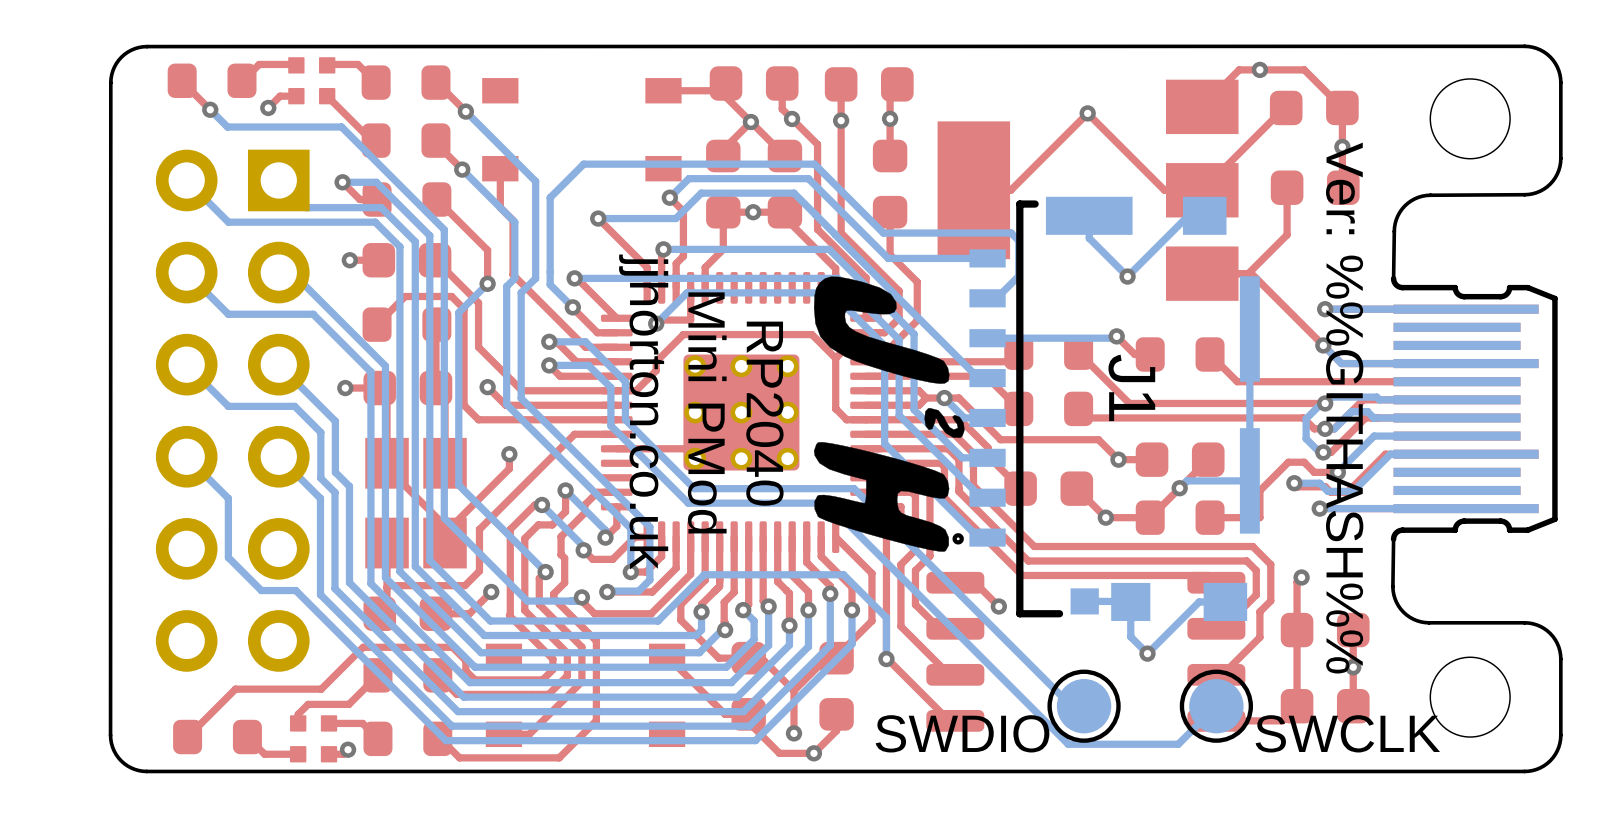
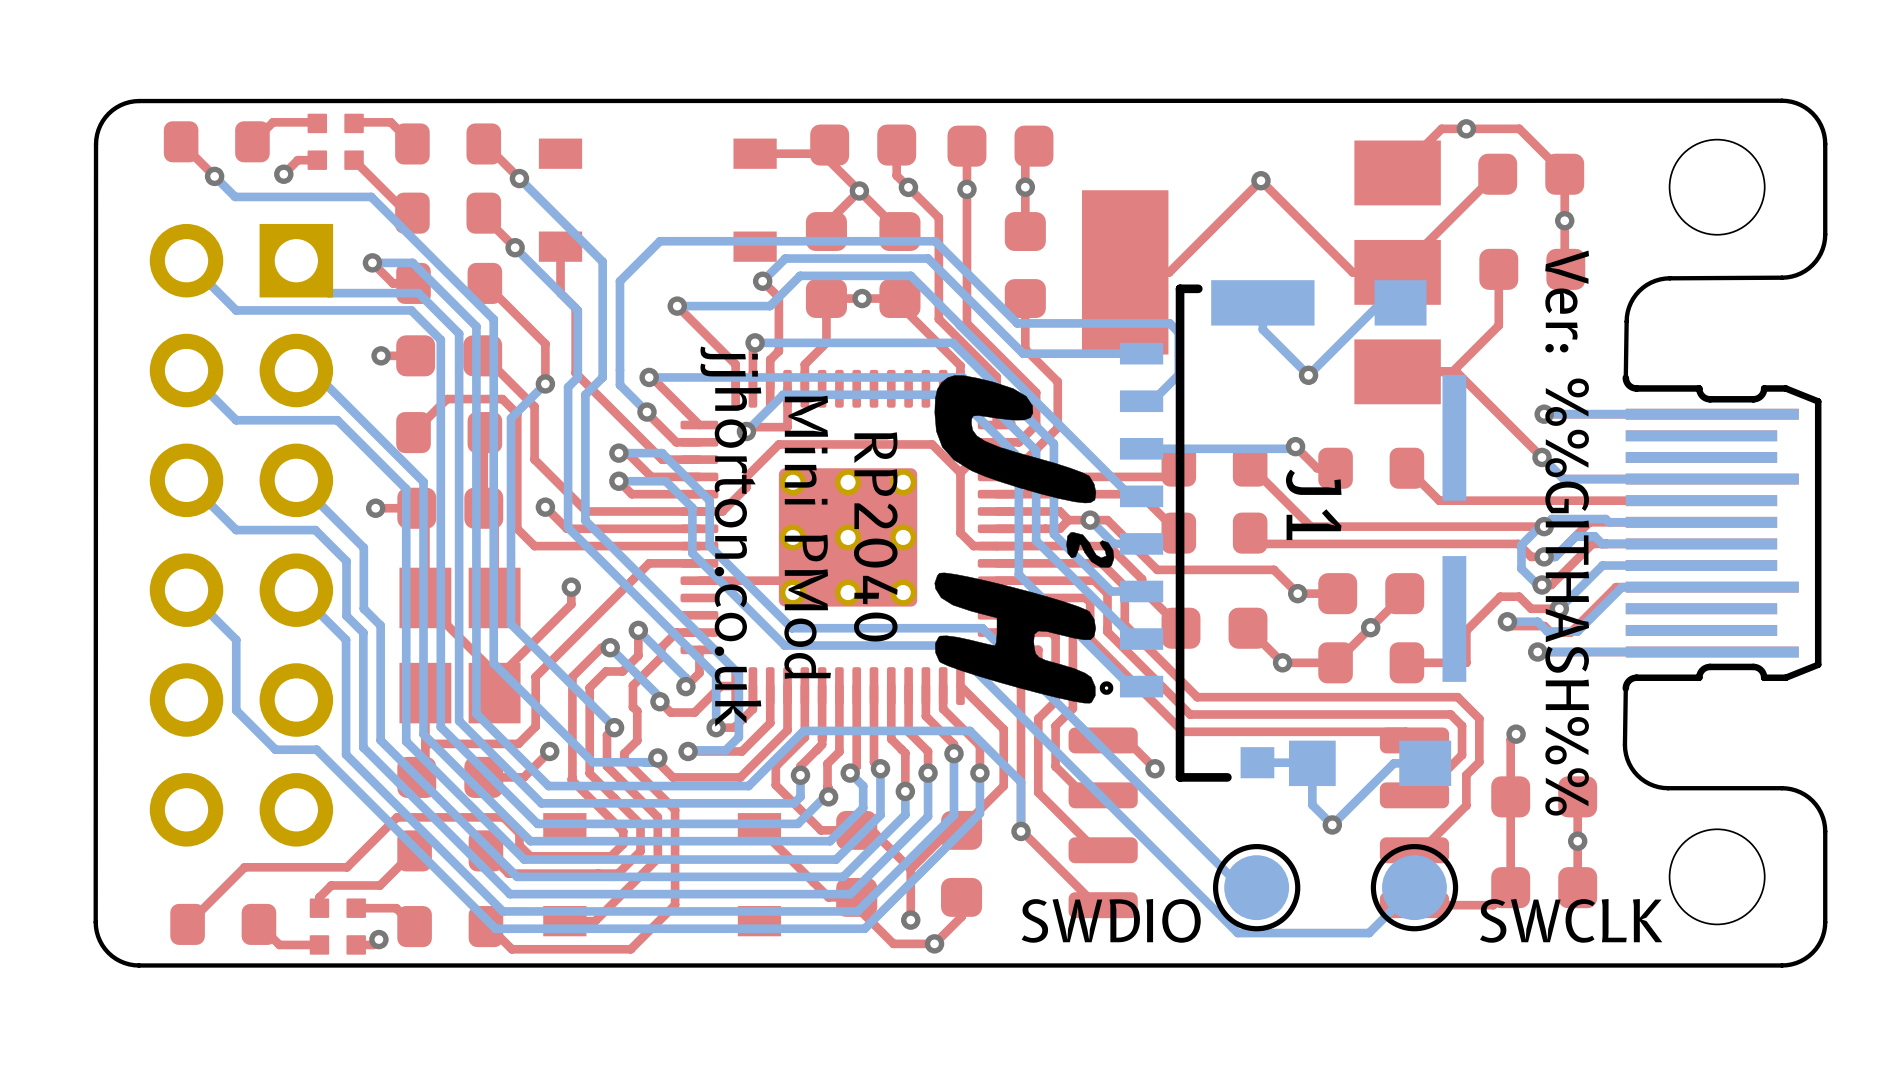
bottom track: (1249, 328) (1249, 480) (1186, 480) (1179, 488) -> none

